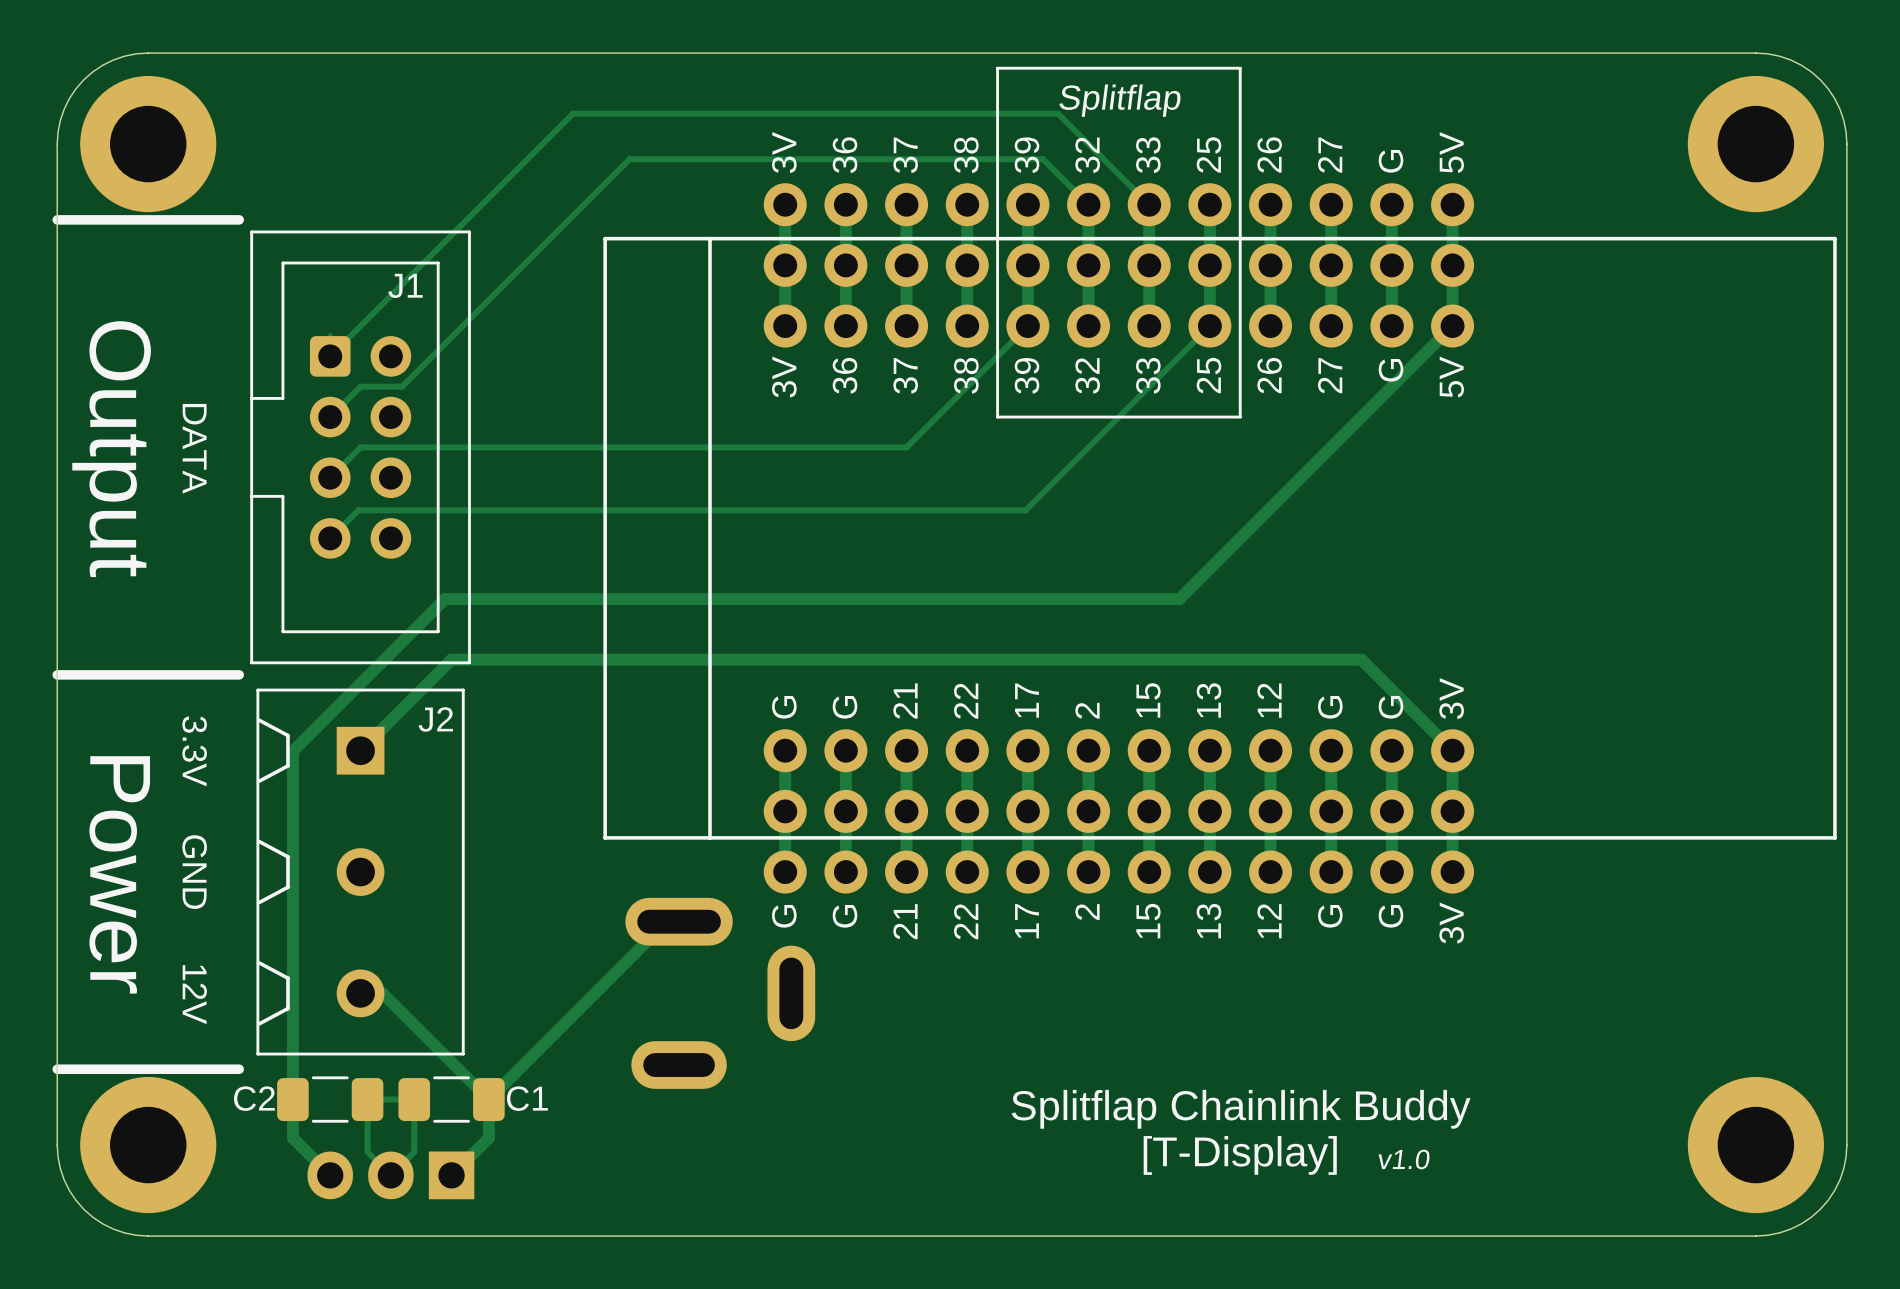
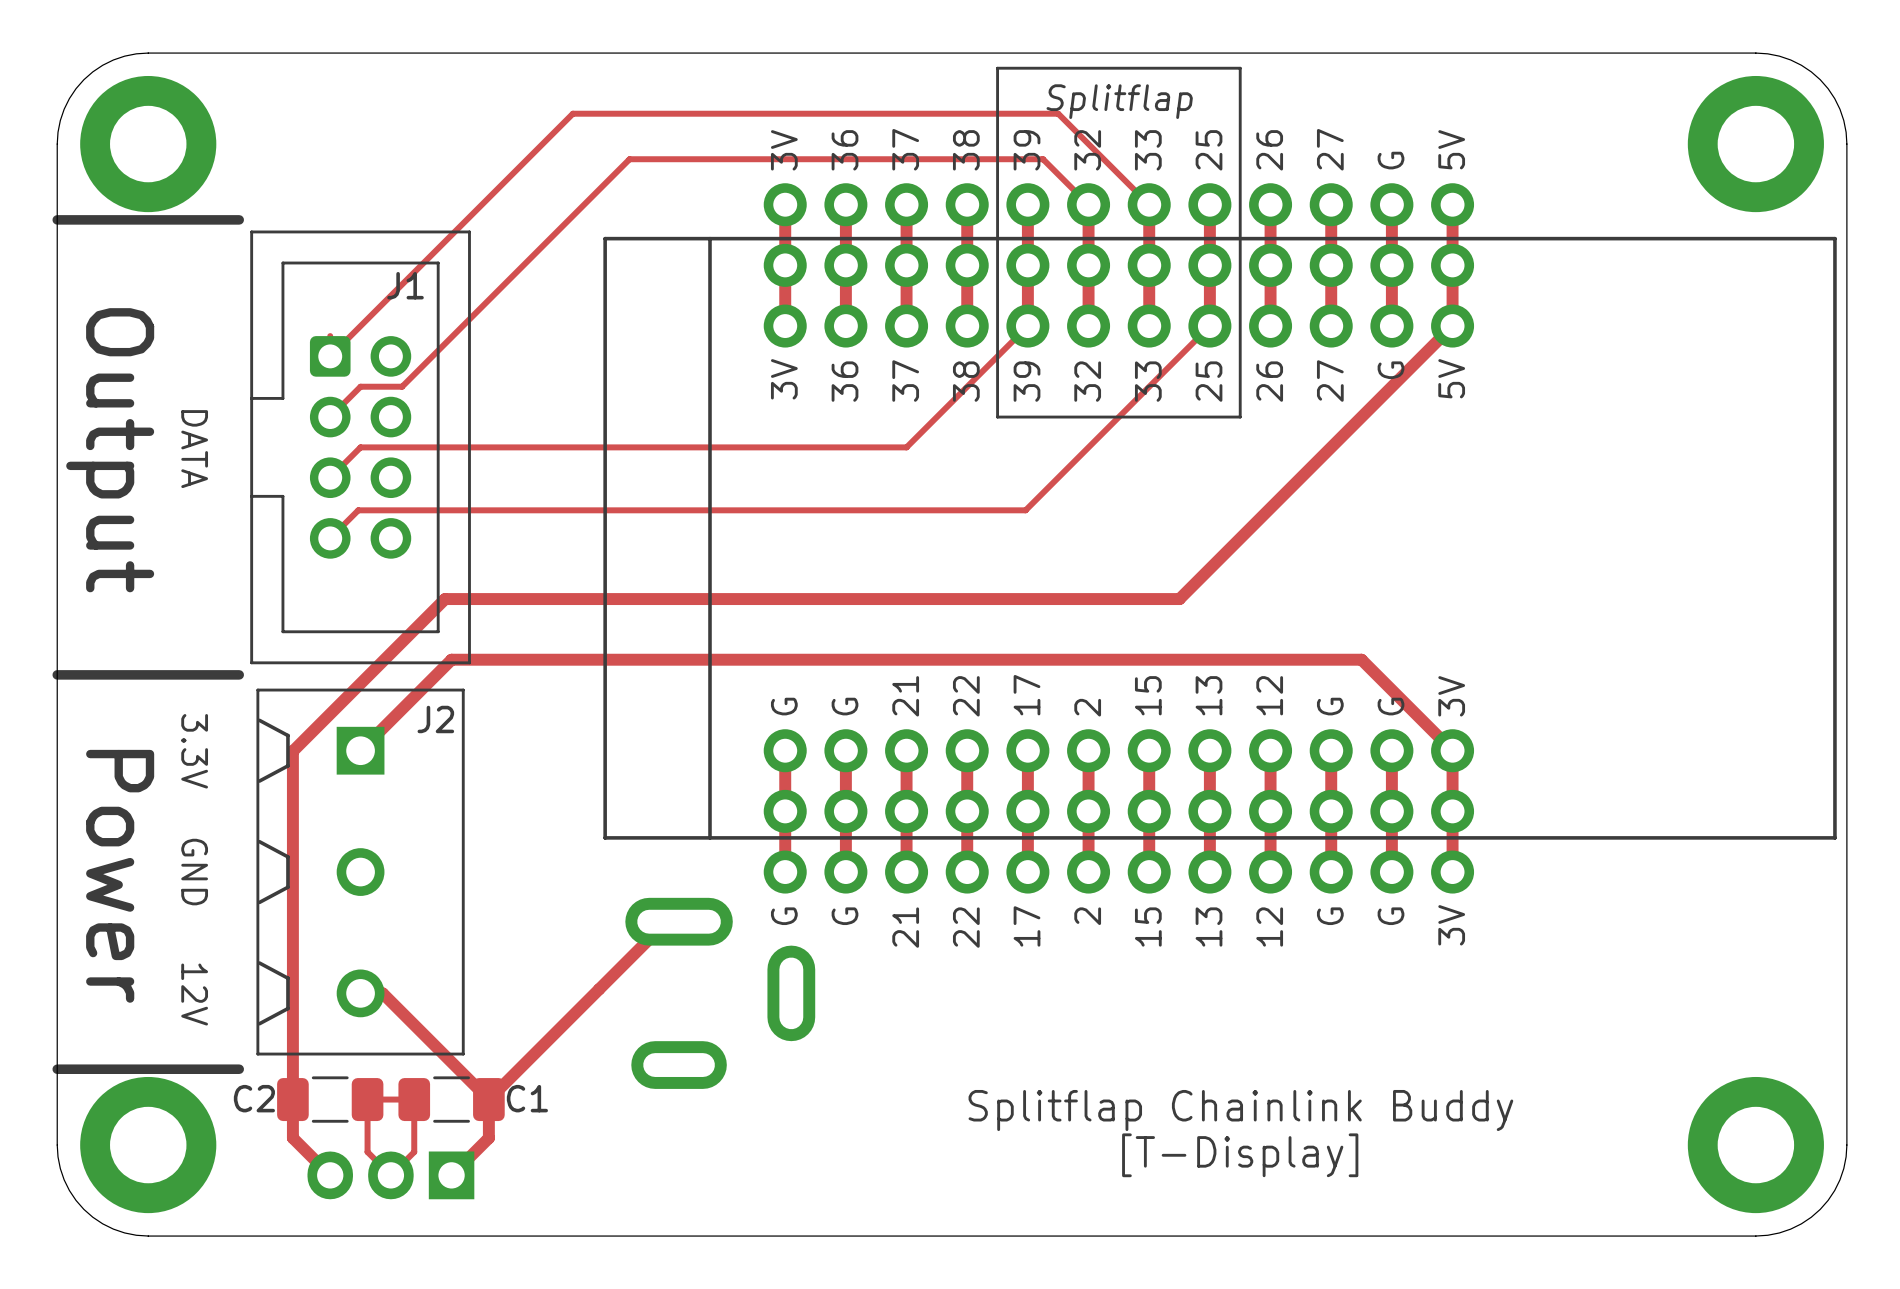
text: v1.0 (1404, 1159) -> none

